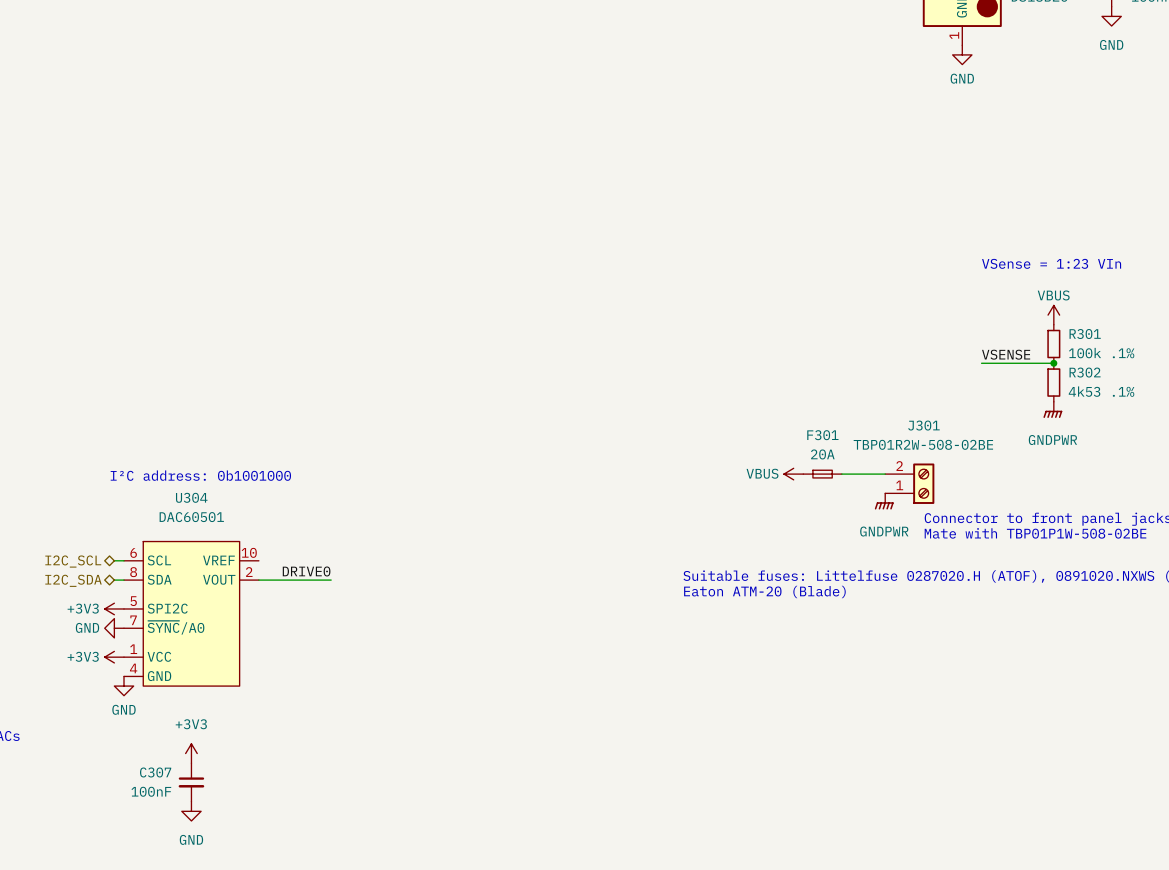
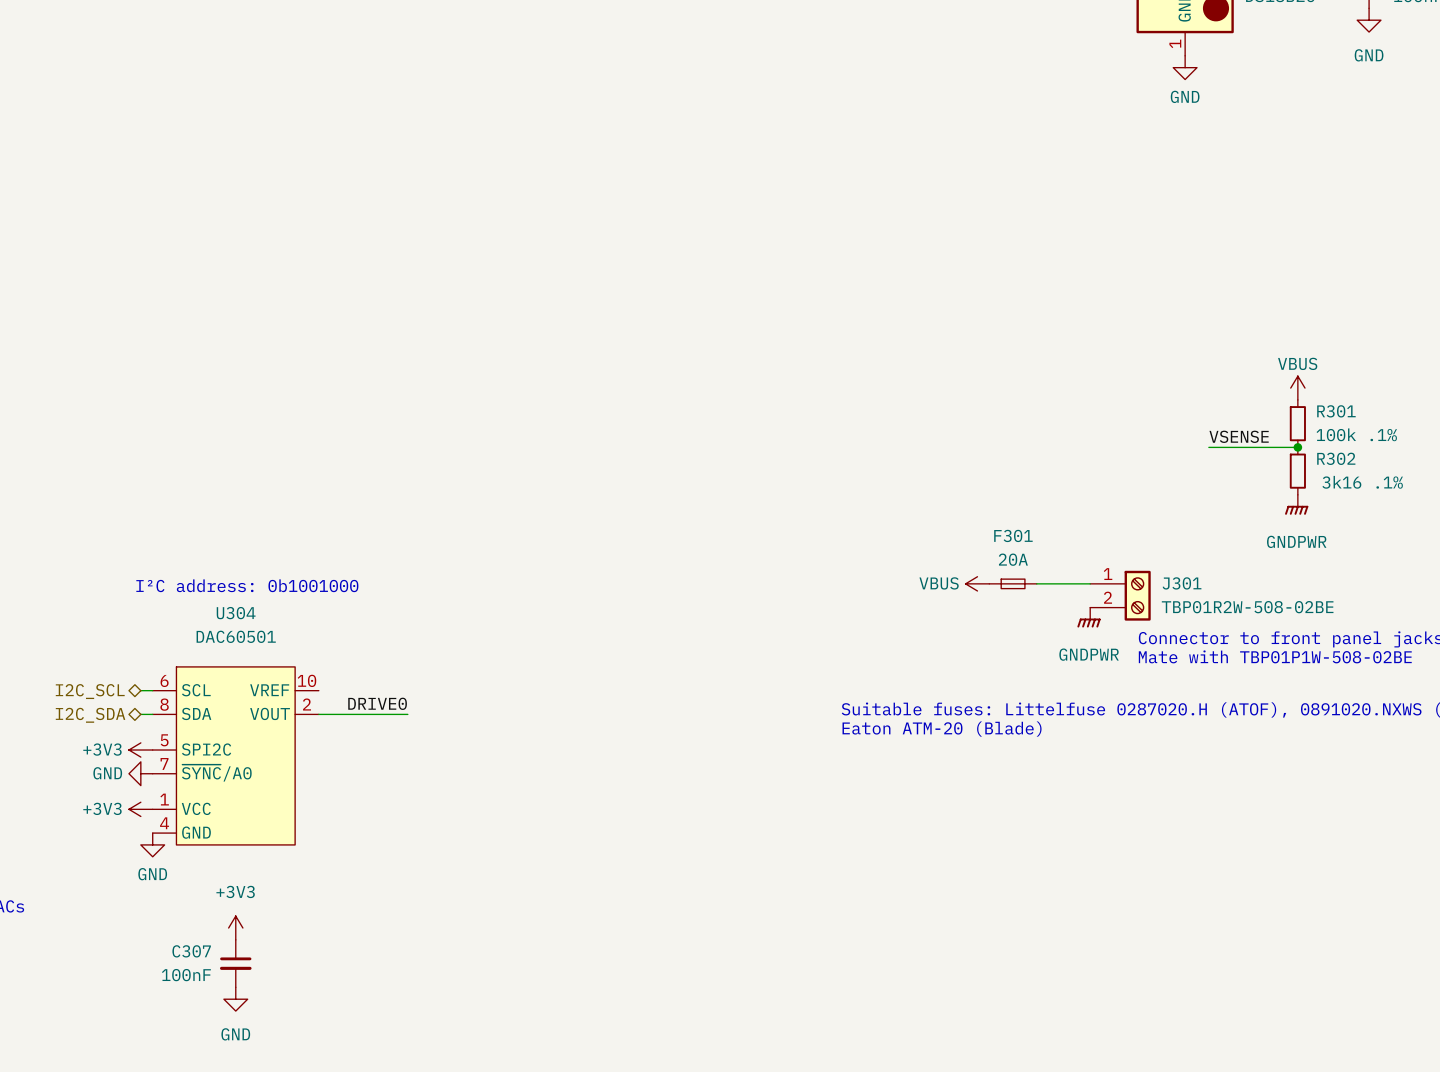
text: VSense = 1:23 VIn (1051, 263) -> none
R302 value: 4k53 .1% (1101, 391) -> 3k16 .1% (1362, 482)
J301 name position: J301 (923, 425) -> J301 (1182, 583)
J301 value position: TBP01R2W-508-02BE (923, 444) -> TBP01R2W-508-02BE (1247, 607)
J301 flip: as is (923, 483) -> up-down (1137, 595)

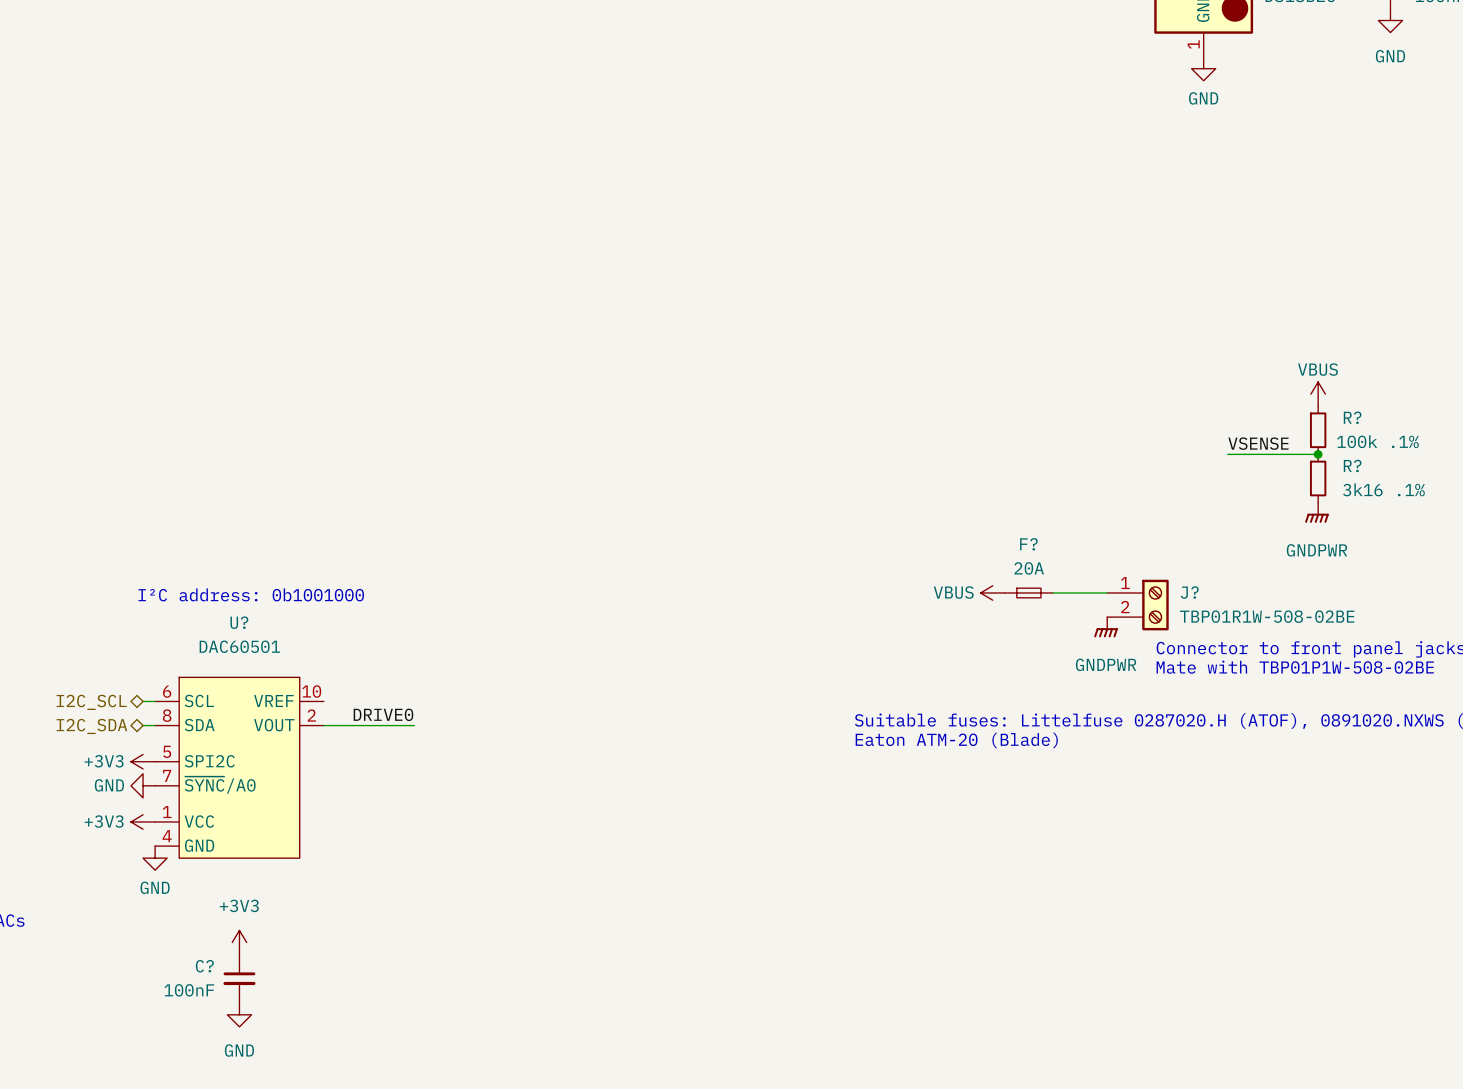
R301 name: R301 (1336, 411) -> R? (1352, 417)
R302 name: R302 (1336, 458) -> R? (1352, 465)
F301 name: F301 (1013, 535) -> F? (1028, 544)
J301 name: J301 (1182, 583) -> J? (1189, 592)
J301 value: TBP01R2W-508-02BE (1247, 607) -> TBP01R1W-508-02BE (1267, 616)
U304 name: U304 (236, 613) -> U? (239, 622)
C307 name: C307 (191, 951) -> C? (204, 966)

